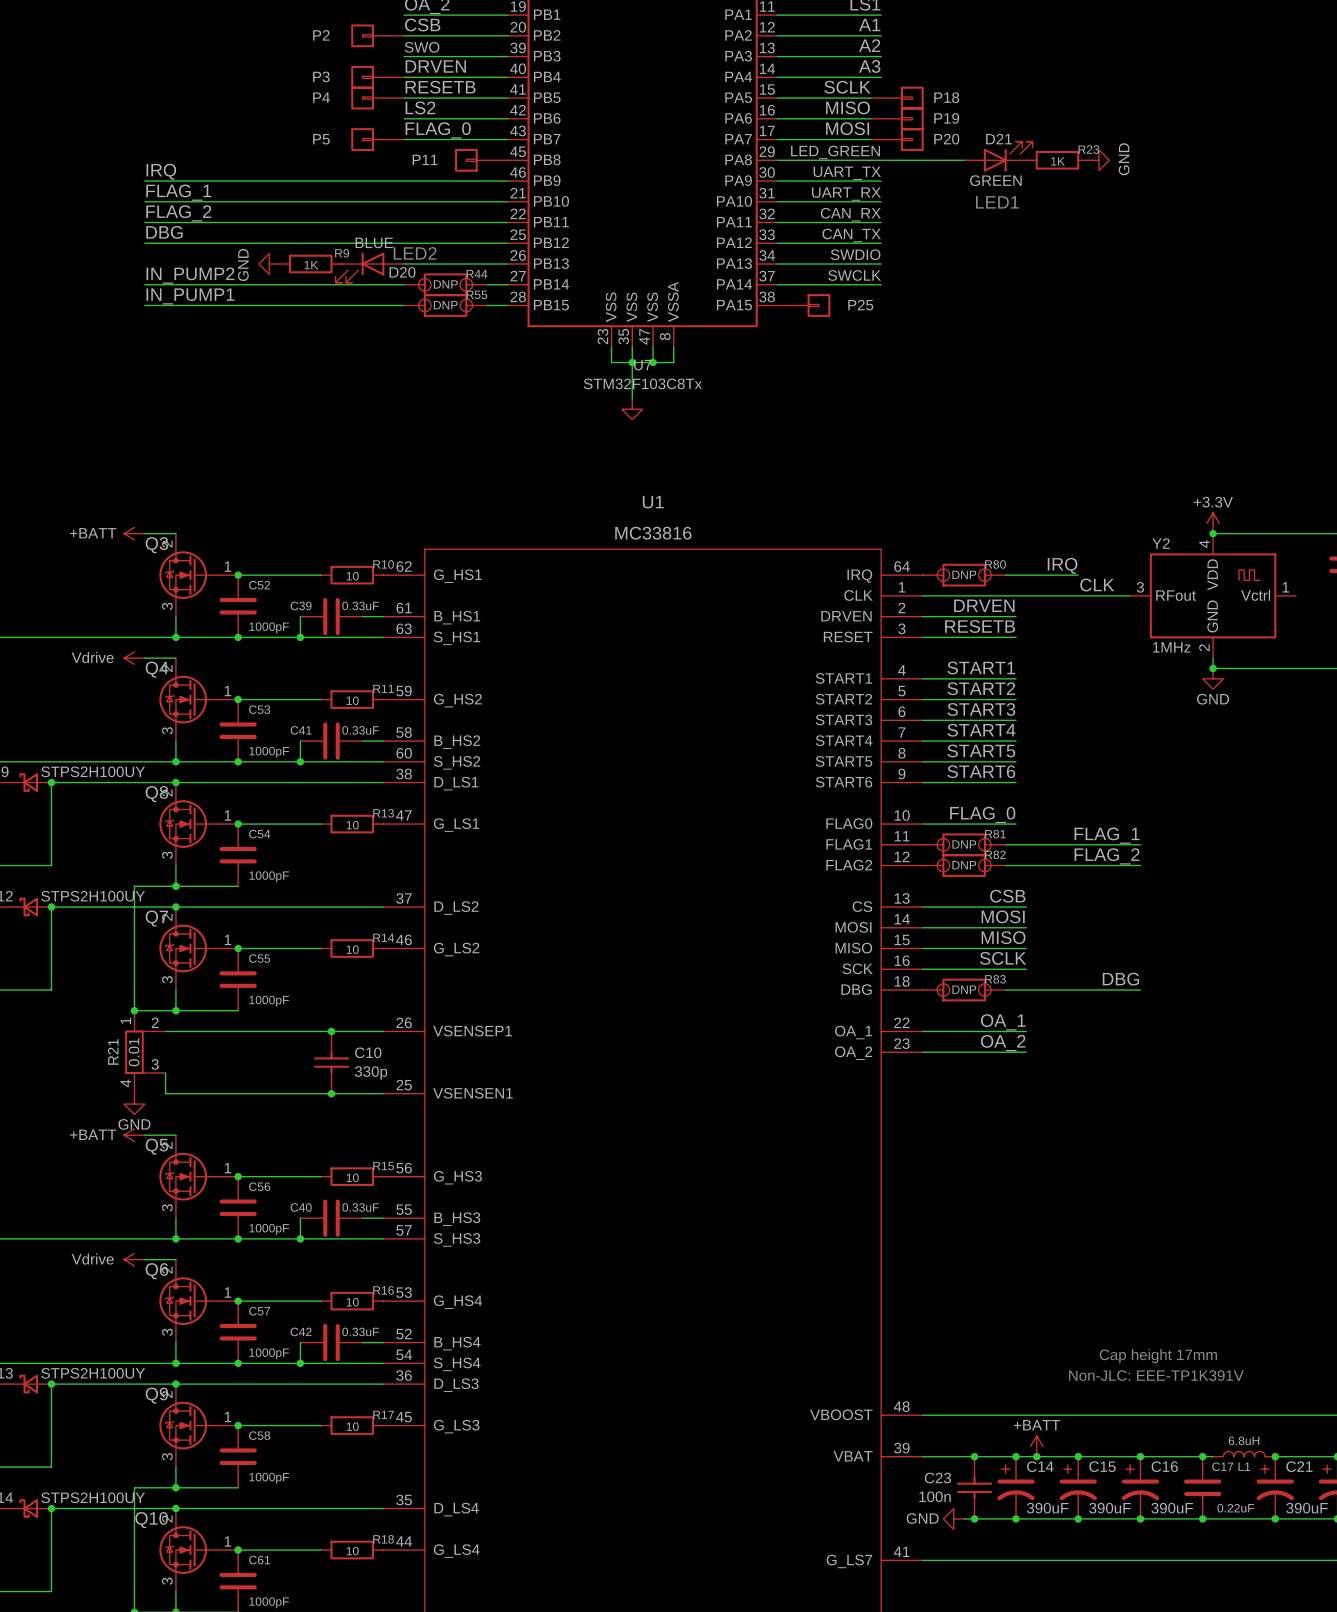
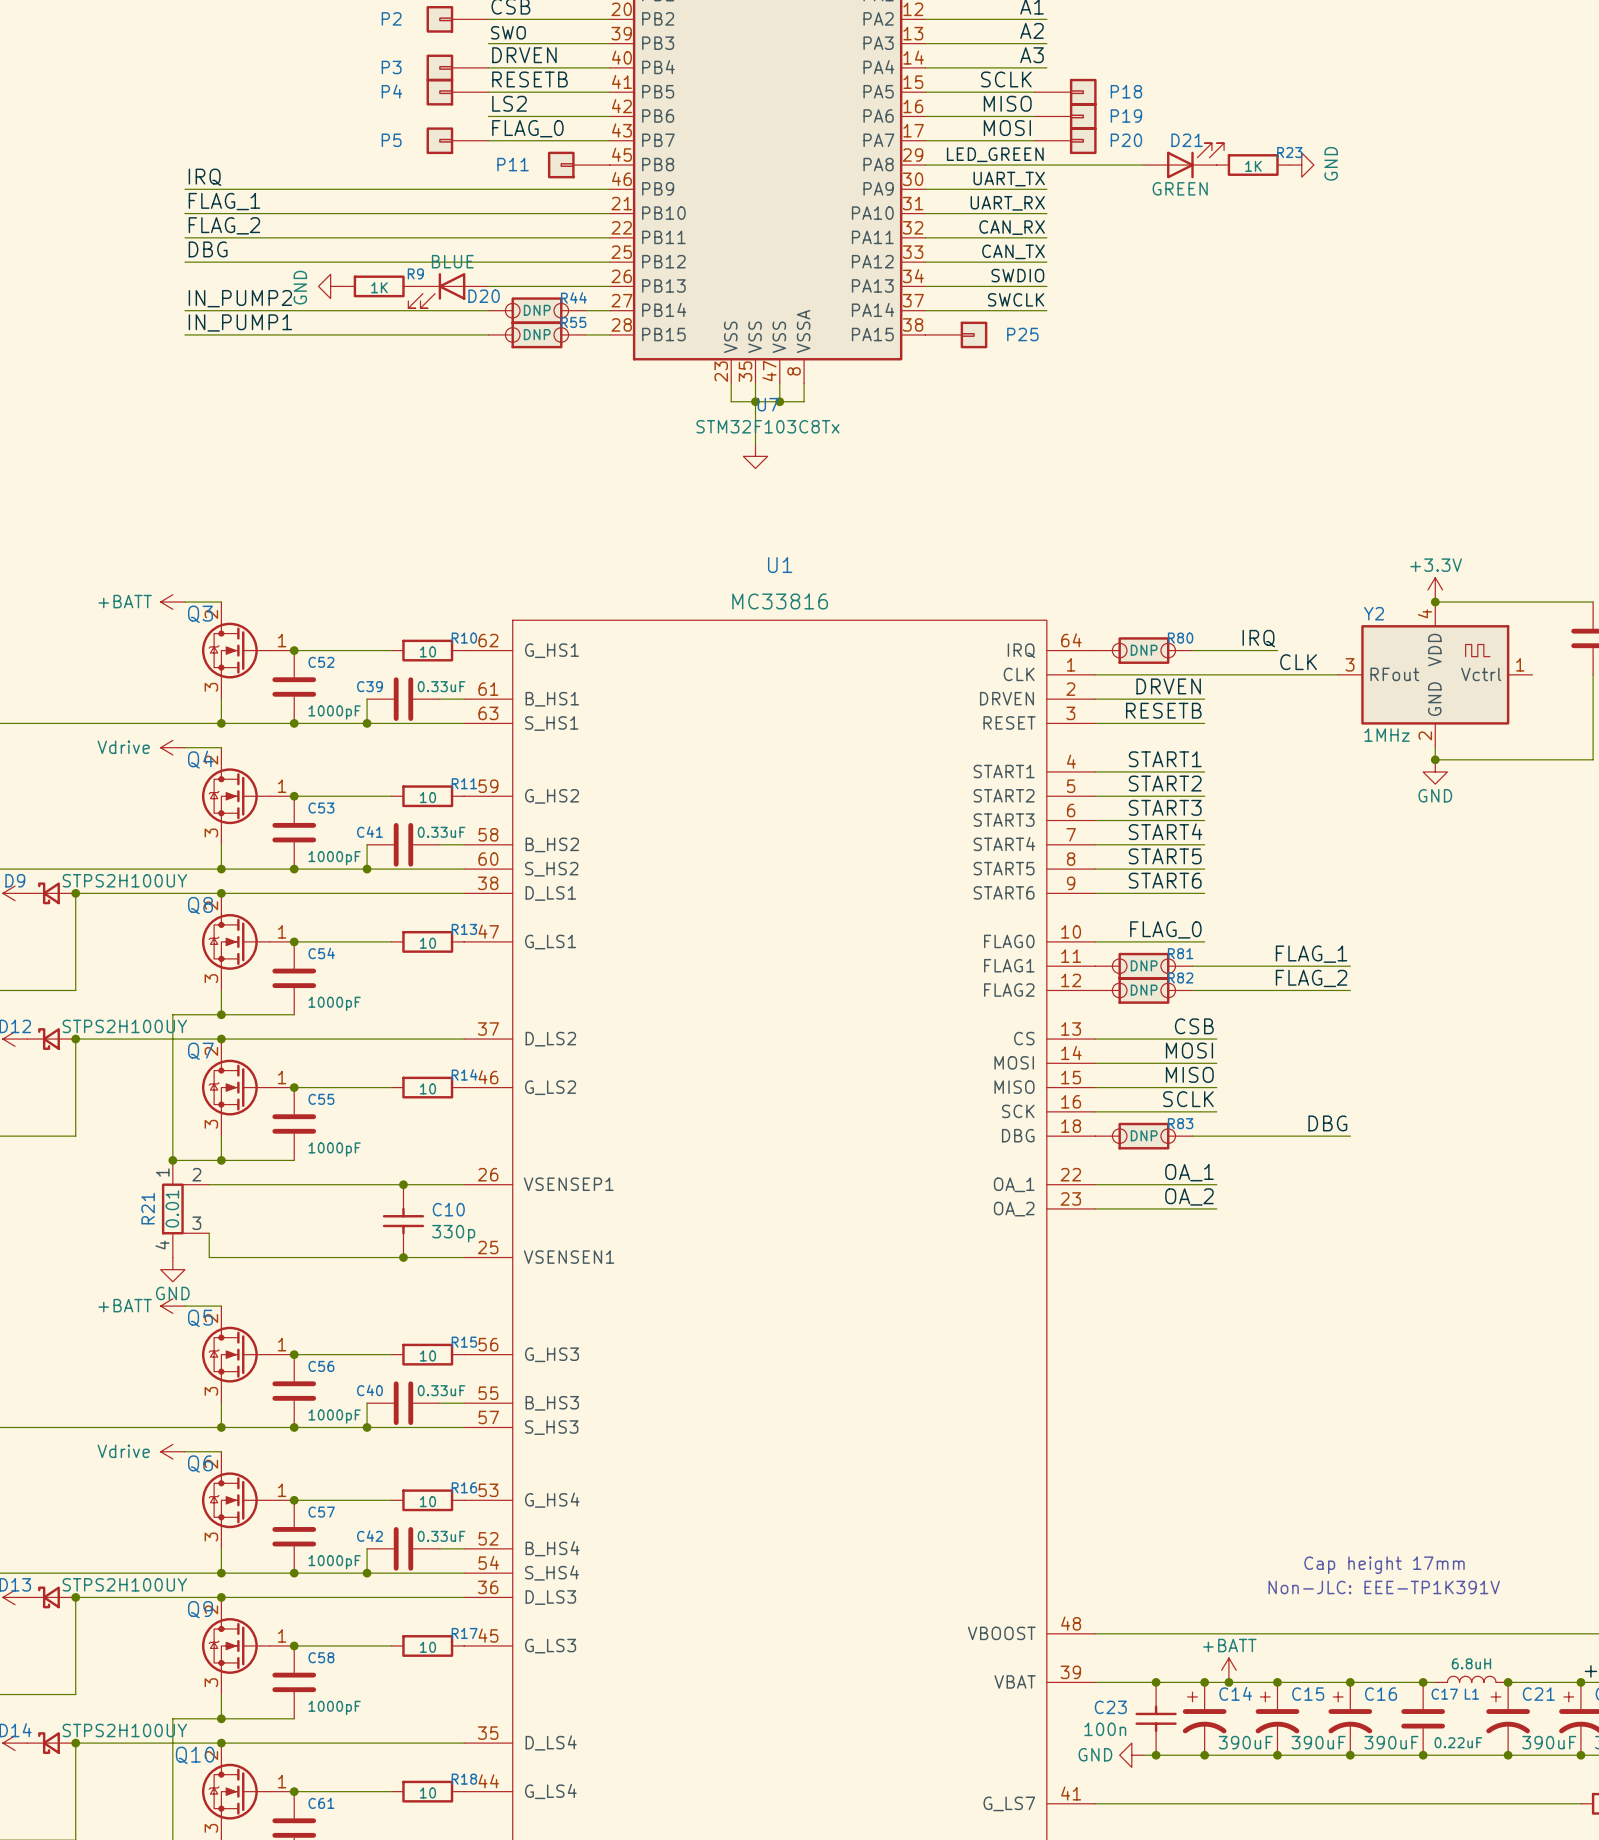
text: LED1 (997, 202) -> none
text: LED2 (415, 253) -> none

